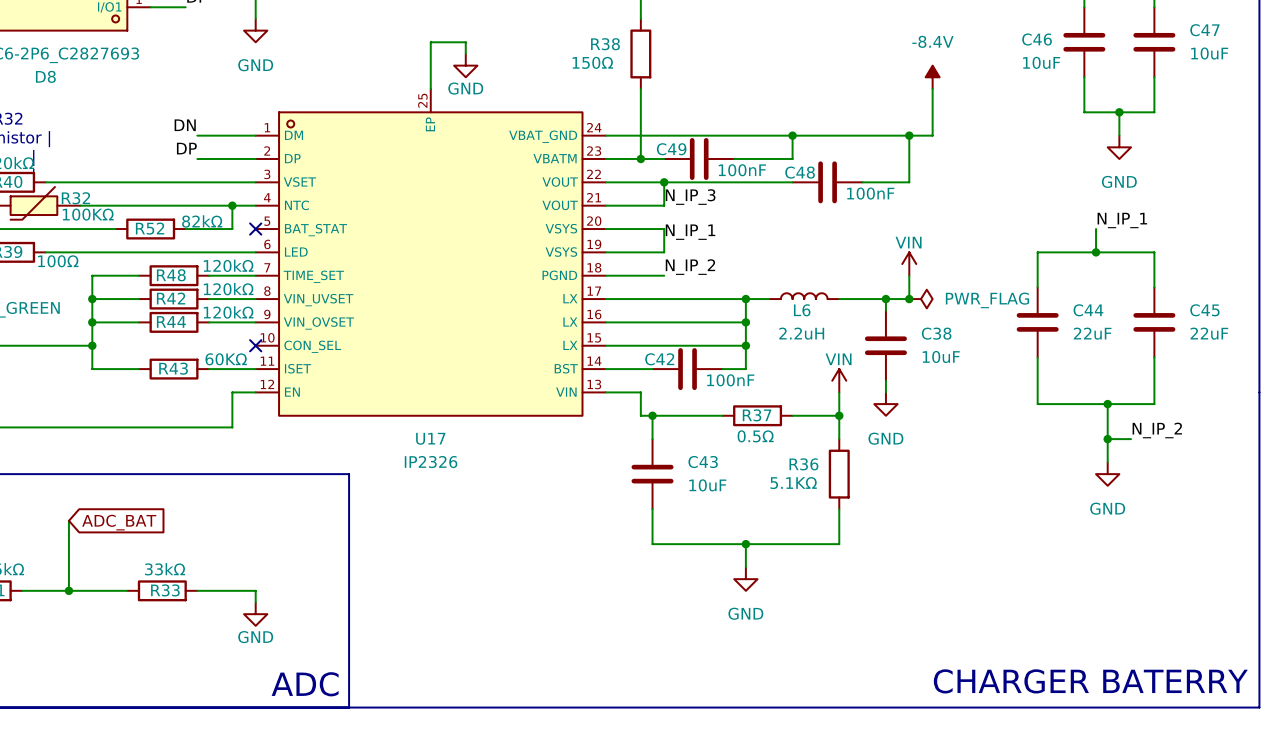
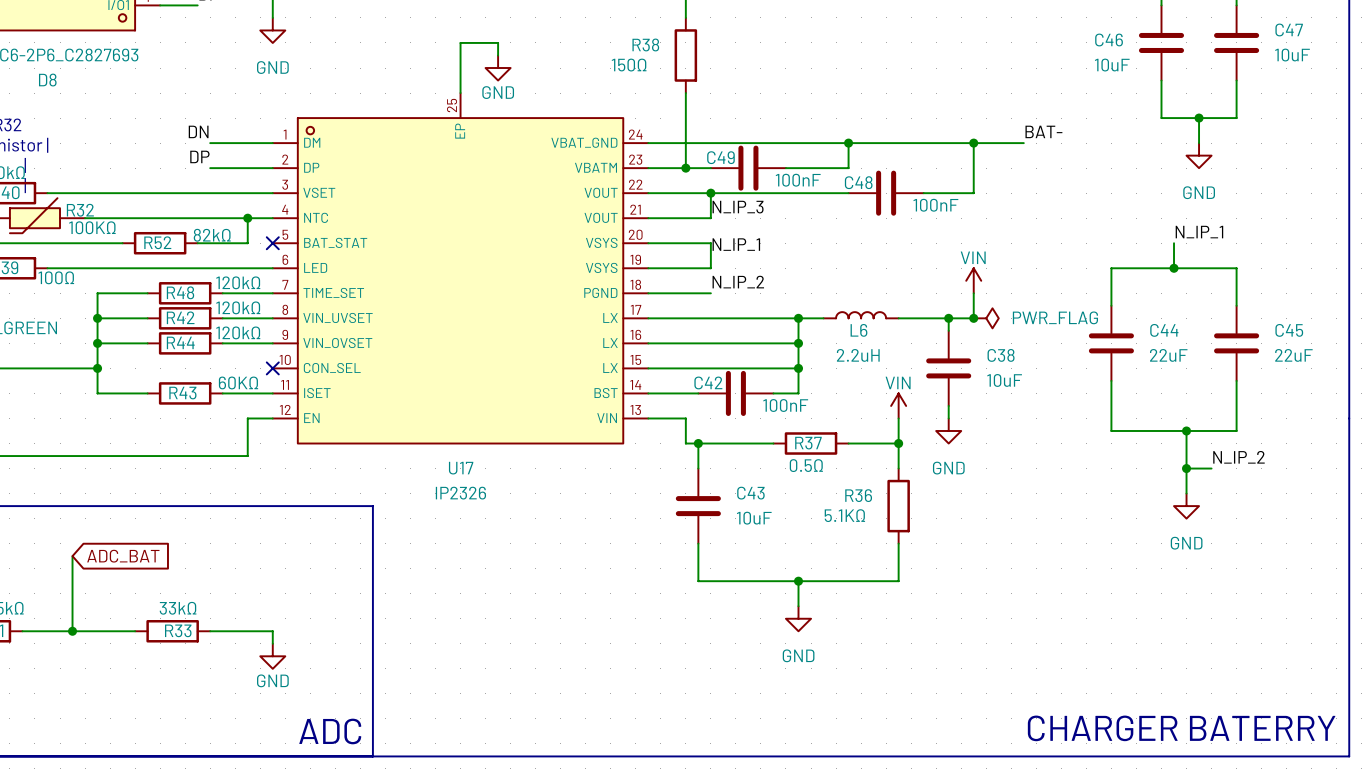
power symbol: -8.4V (932, 77) -> none
wire: (932, 88) (932, 135) -> (1023, 143) (998, 143)
label: none -> BAT- (1043, 131)

